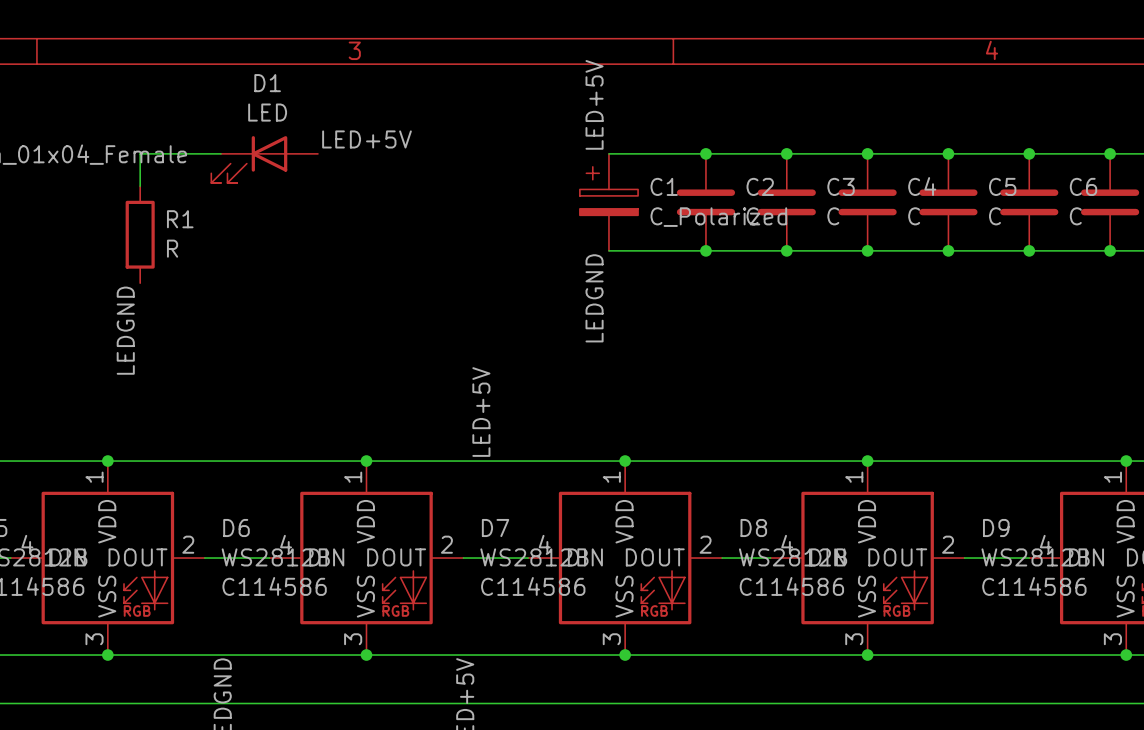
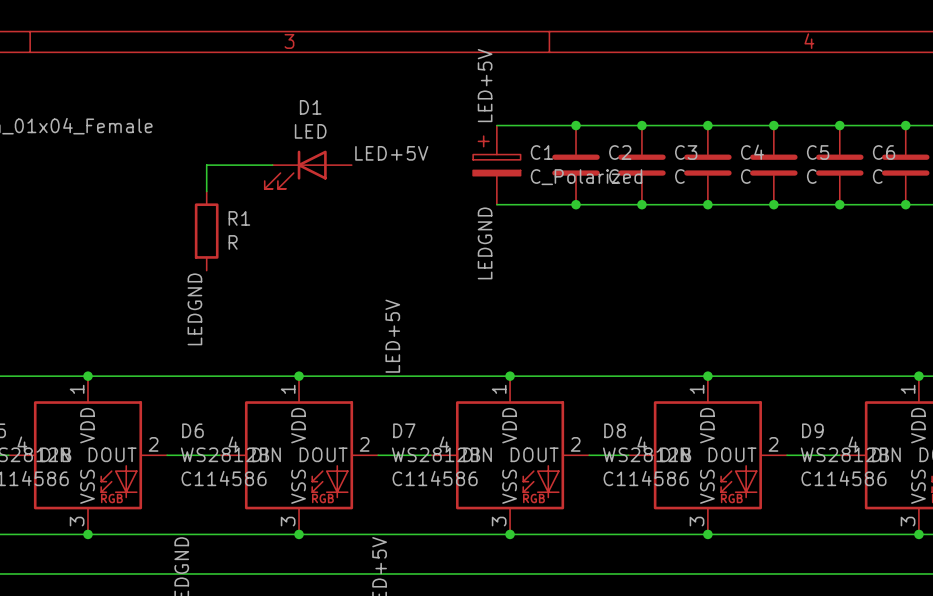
label position: LED+5V (366, 139) -> LED+5V (391, 153)
wire: (221, 153) (140, 153) (140, 186) -> (272, 165) (206, 165) (206, 191)
D1 position: (264, 159) -> (308, 169)
R1 position: (140, 234) -> (206, 231)
label position: LEDGND (125, 330) -> LEDGND (194, 309)

